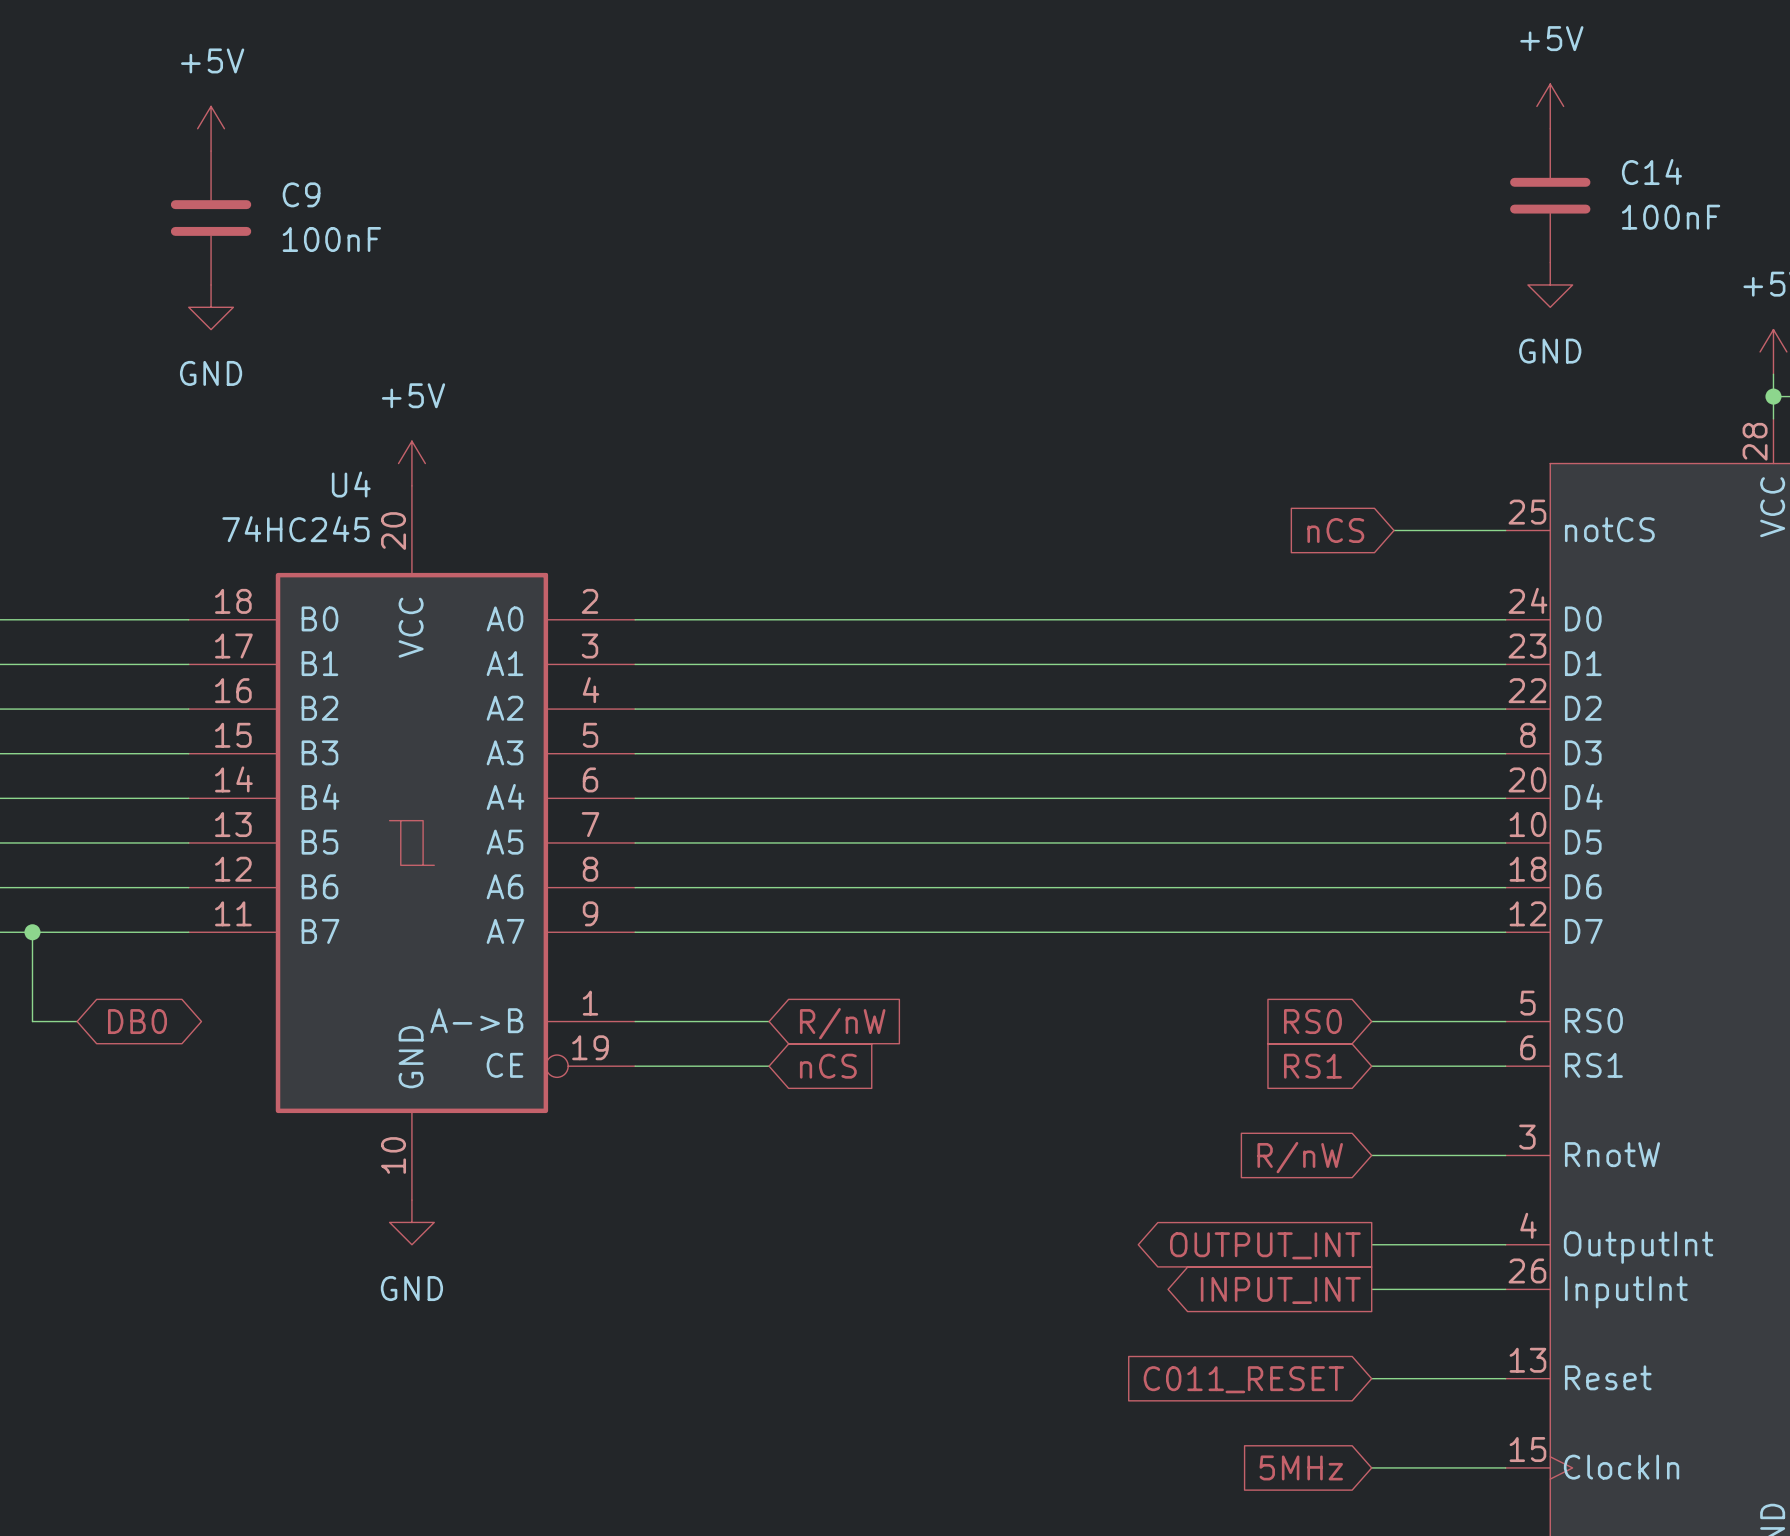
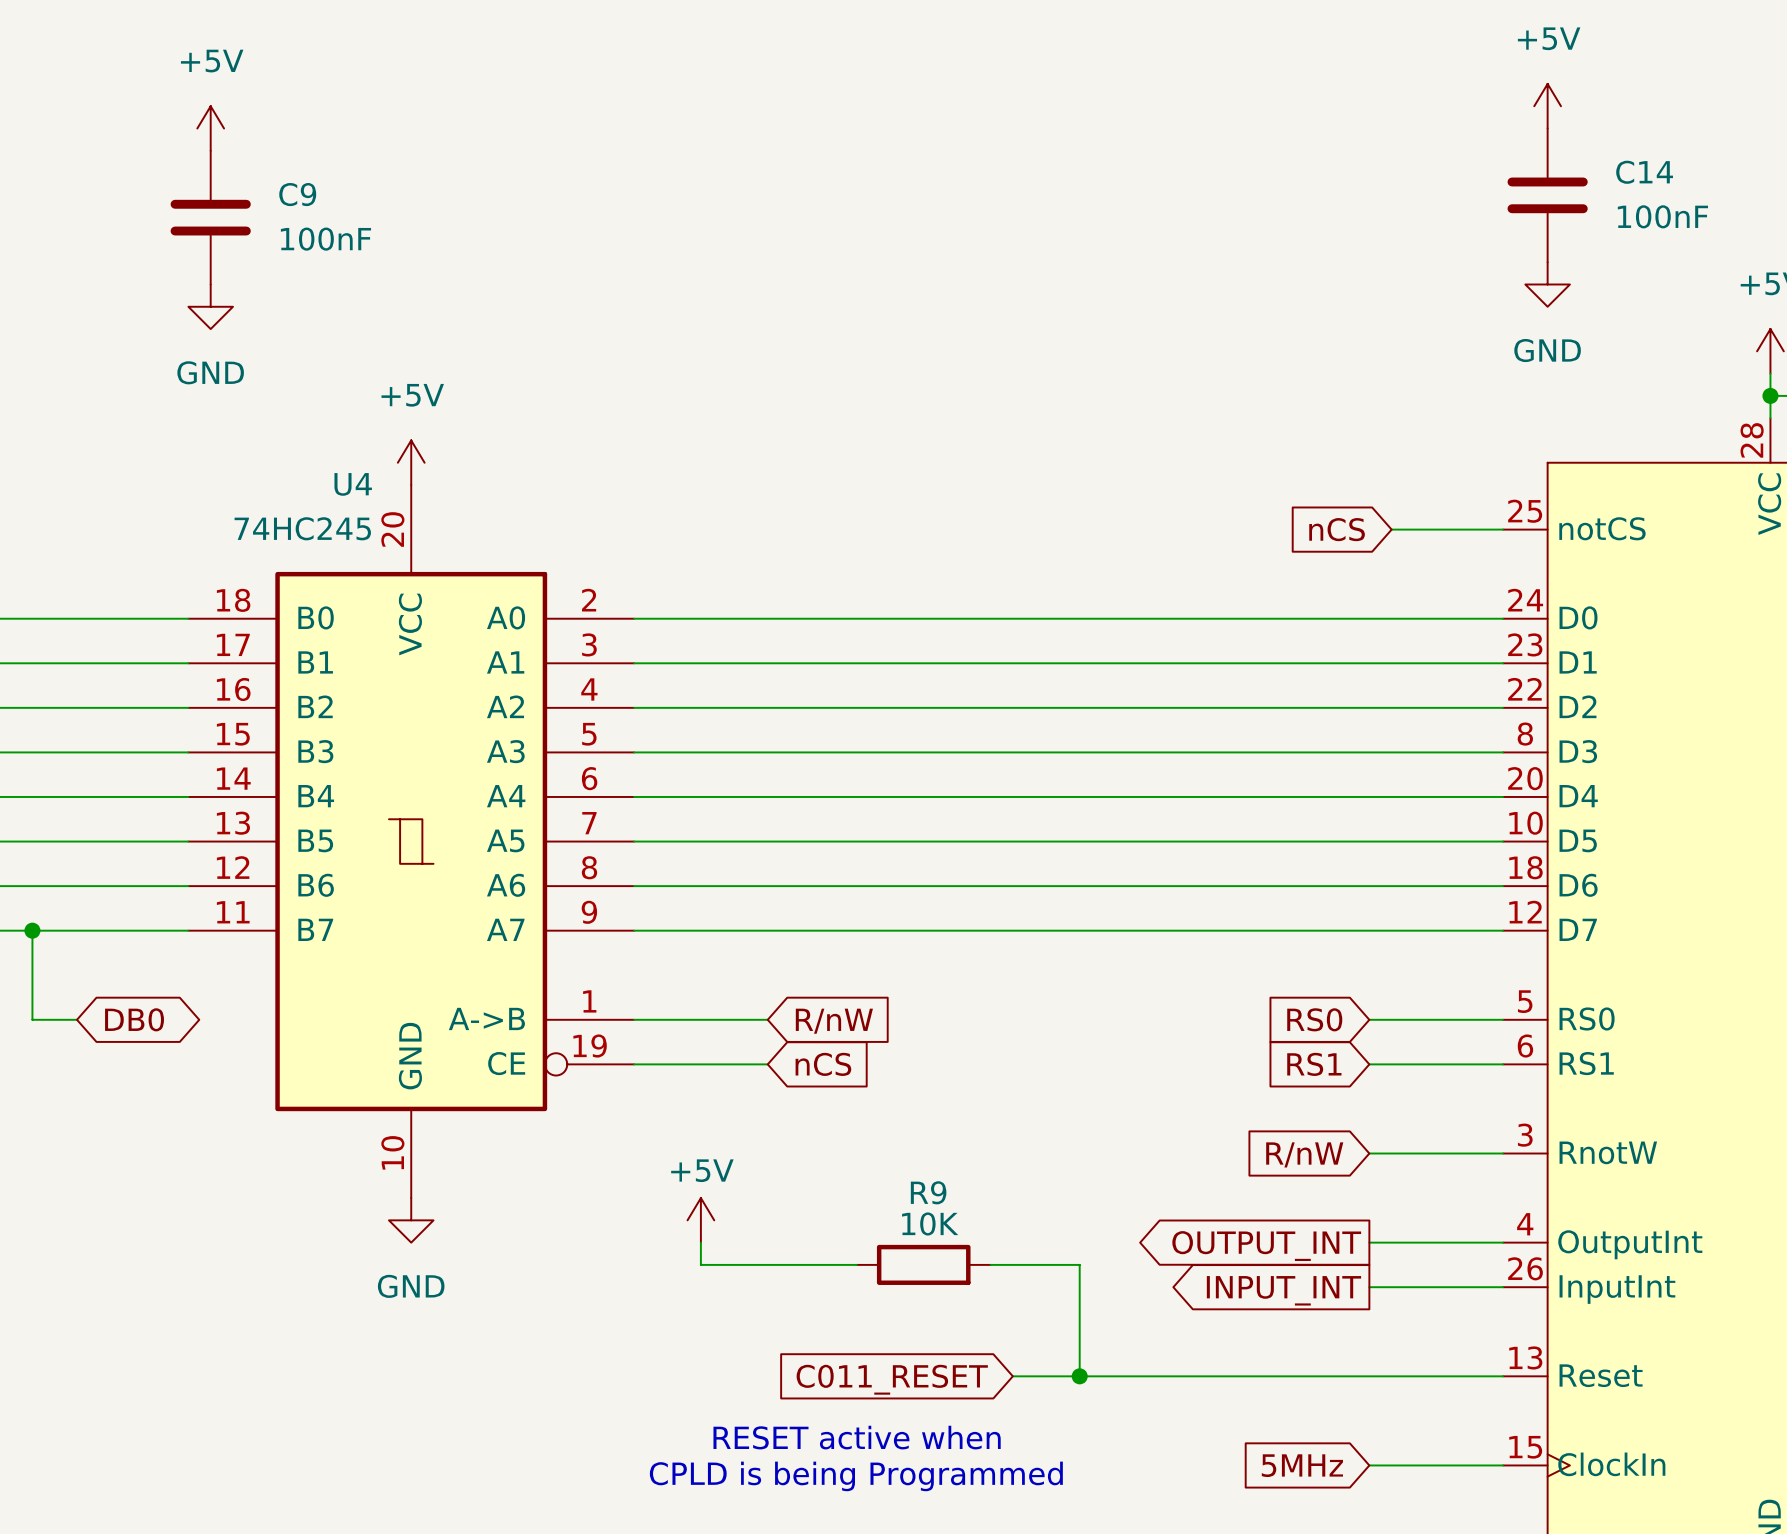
power symbol: none -> +5V (700, 1220)
wire: none -> (700, 1242) (700, 1264) (856, 1264)
R9: none -> 10K (923, 1264)
wire: none -> (990, 1264) (1079, 1264) (1079, 1376)
wire: none -> (1012, 1376) (1369, 1376)
junction: none -> (1079, 1376)
global label position: C011_RESET (1243, 1379) -> C011_RESET (892, 1379)
text: none -> RESET active when (857, 1437)
text: none -> CPLD is being Programmed (856, 1476)

